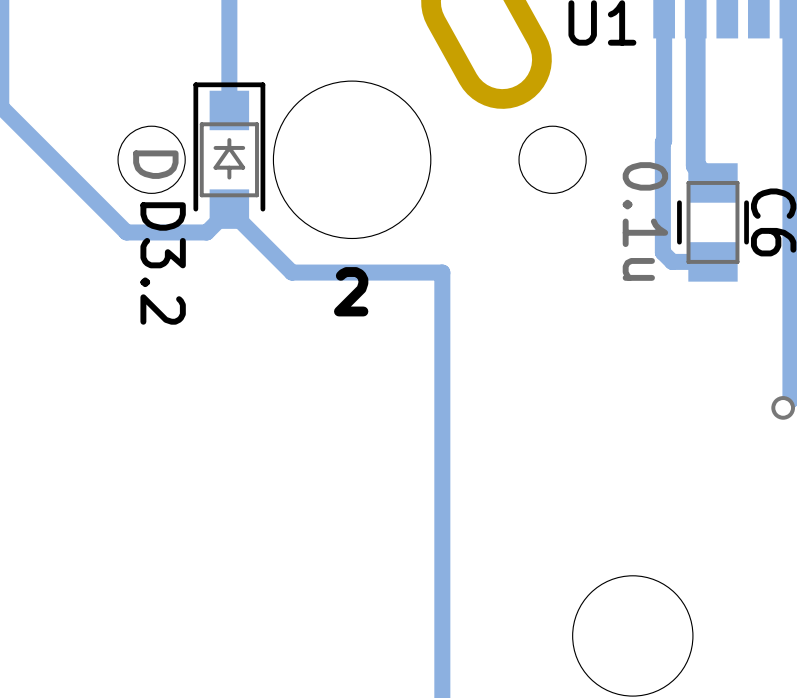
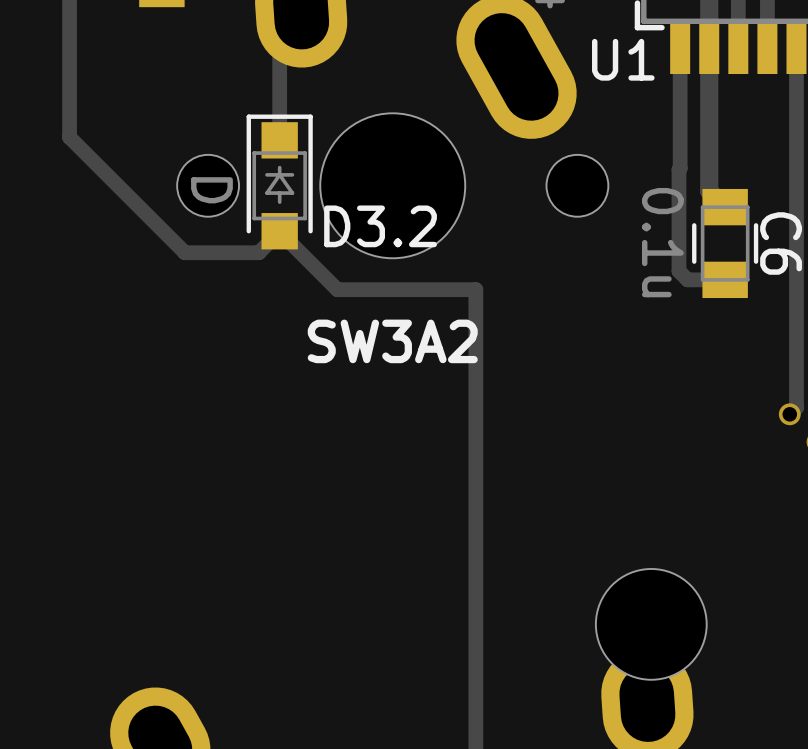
D3.2 name rotation: 0° (163, 263) -> 90° counterclockwise (380, 226)
D3.2 name position: D3.2 (163, 263) -> D3.2 (380, 226)
text: 2 (351, 291) -> none
SW3A2 name: none -> SW3A2 (392, 341)

